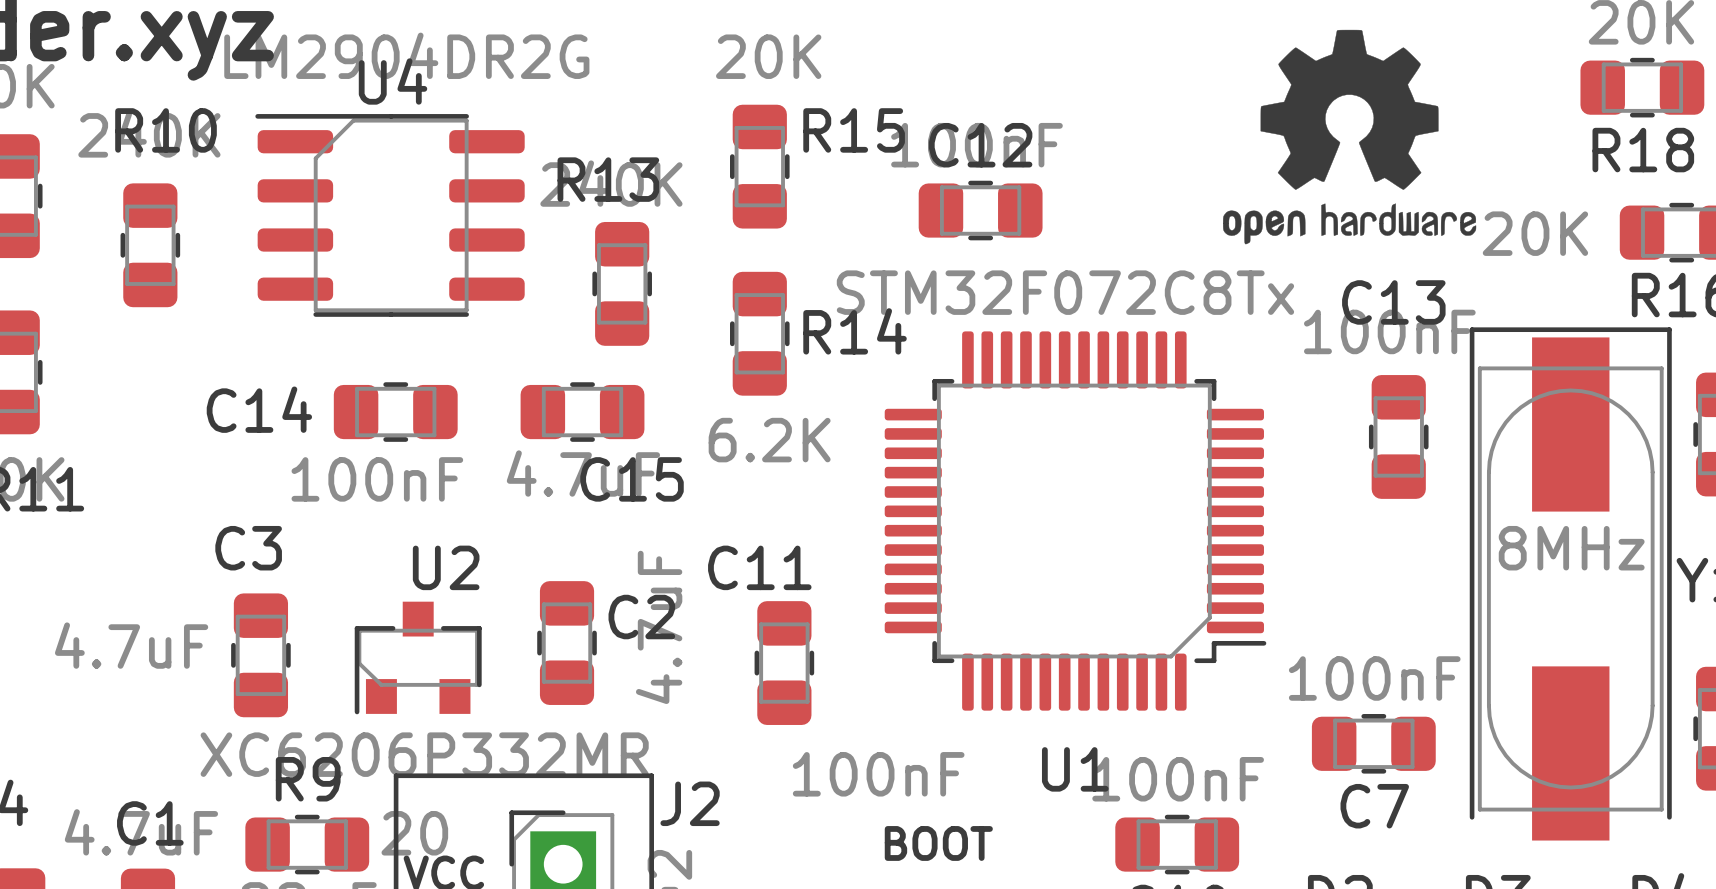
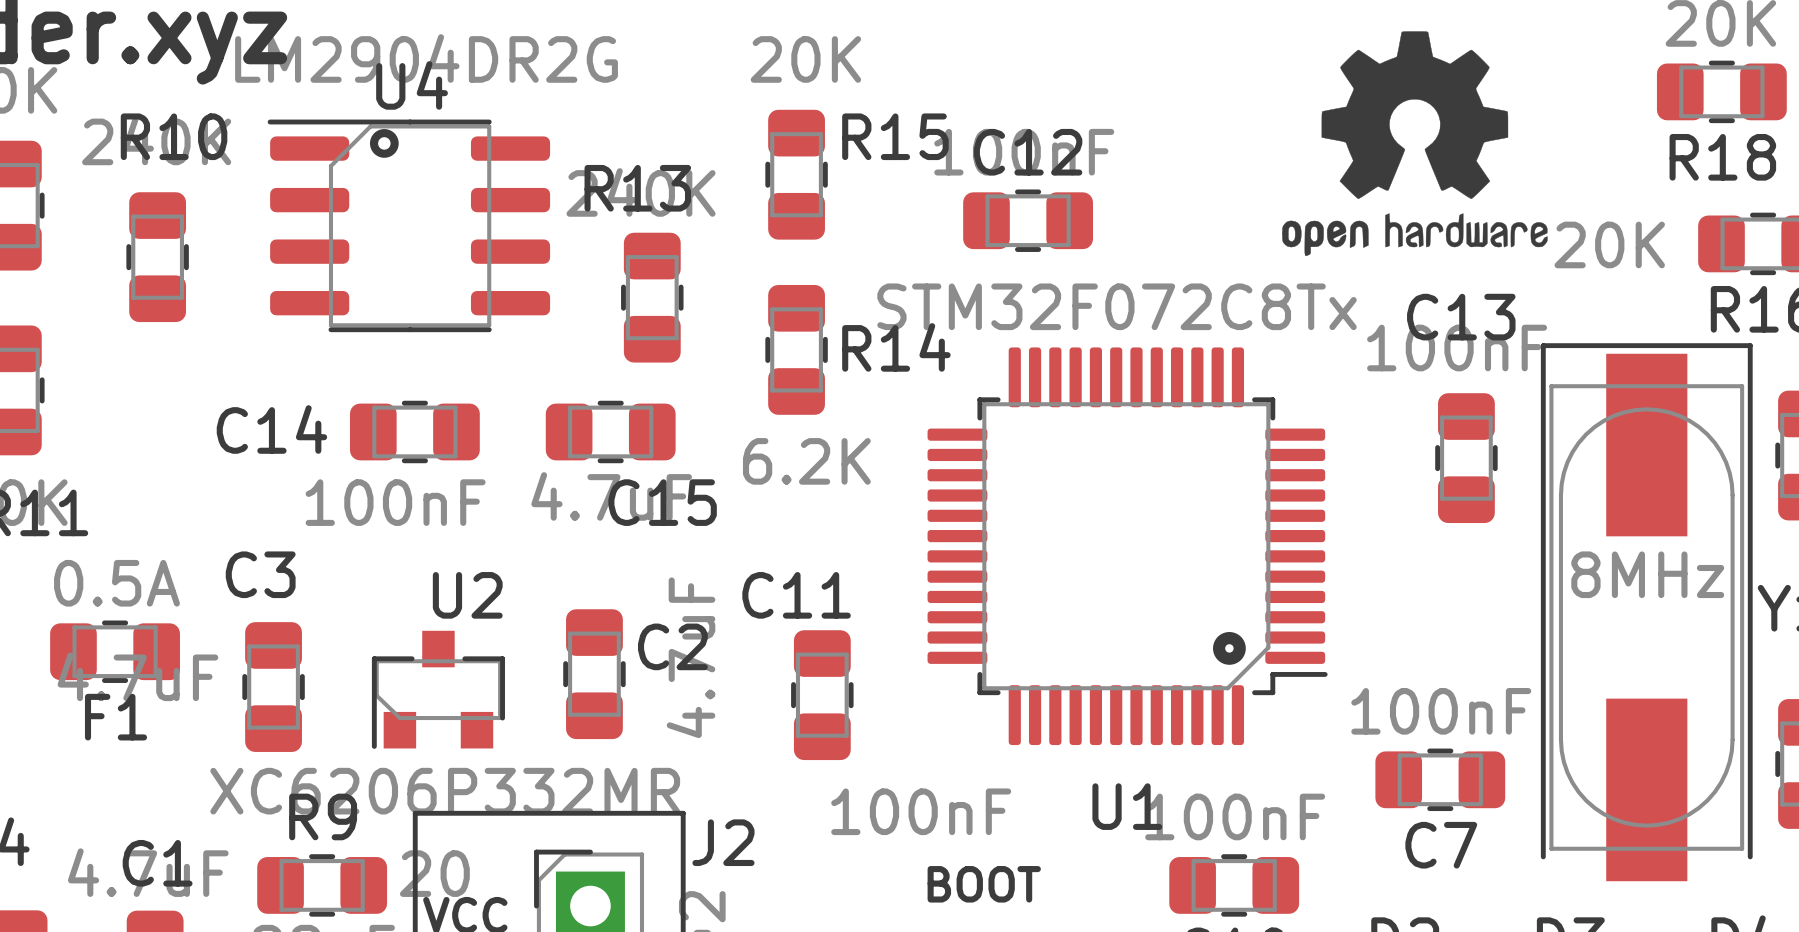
drawing: none -> [369, 129, 399, 158]
drawing: none -> [1213, 632, 1246, 665]
F1: none -> 0.5A (115, 651)

